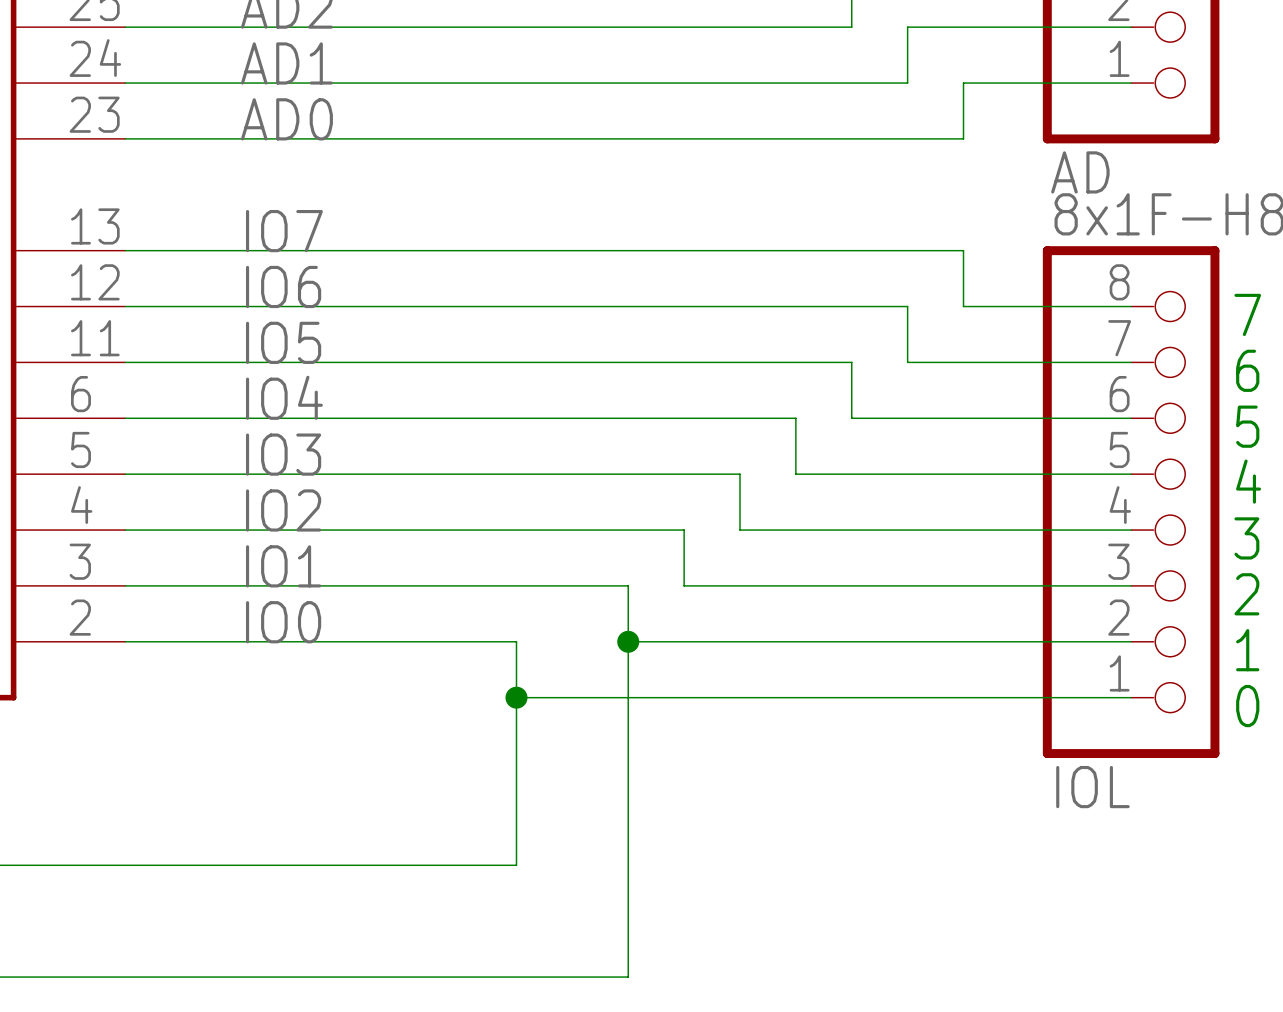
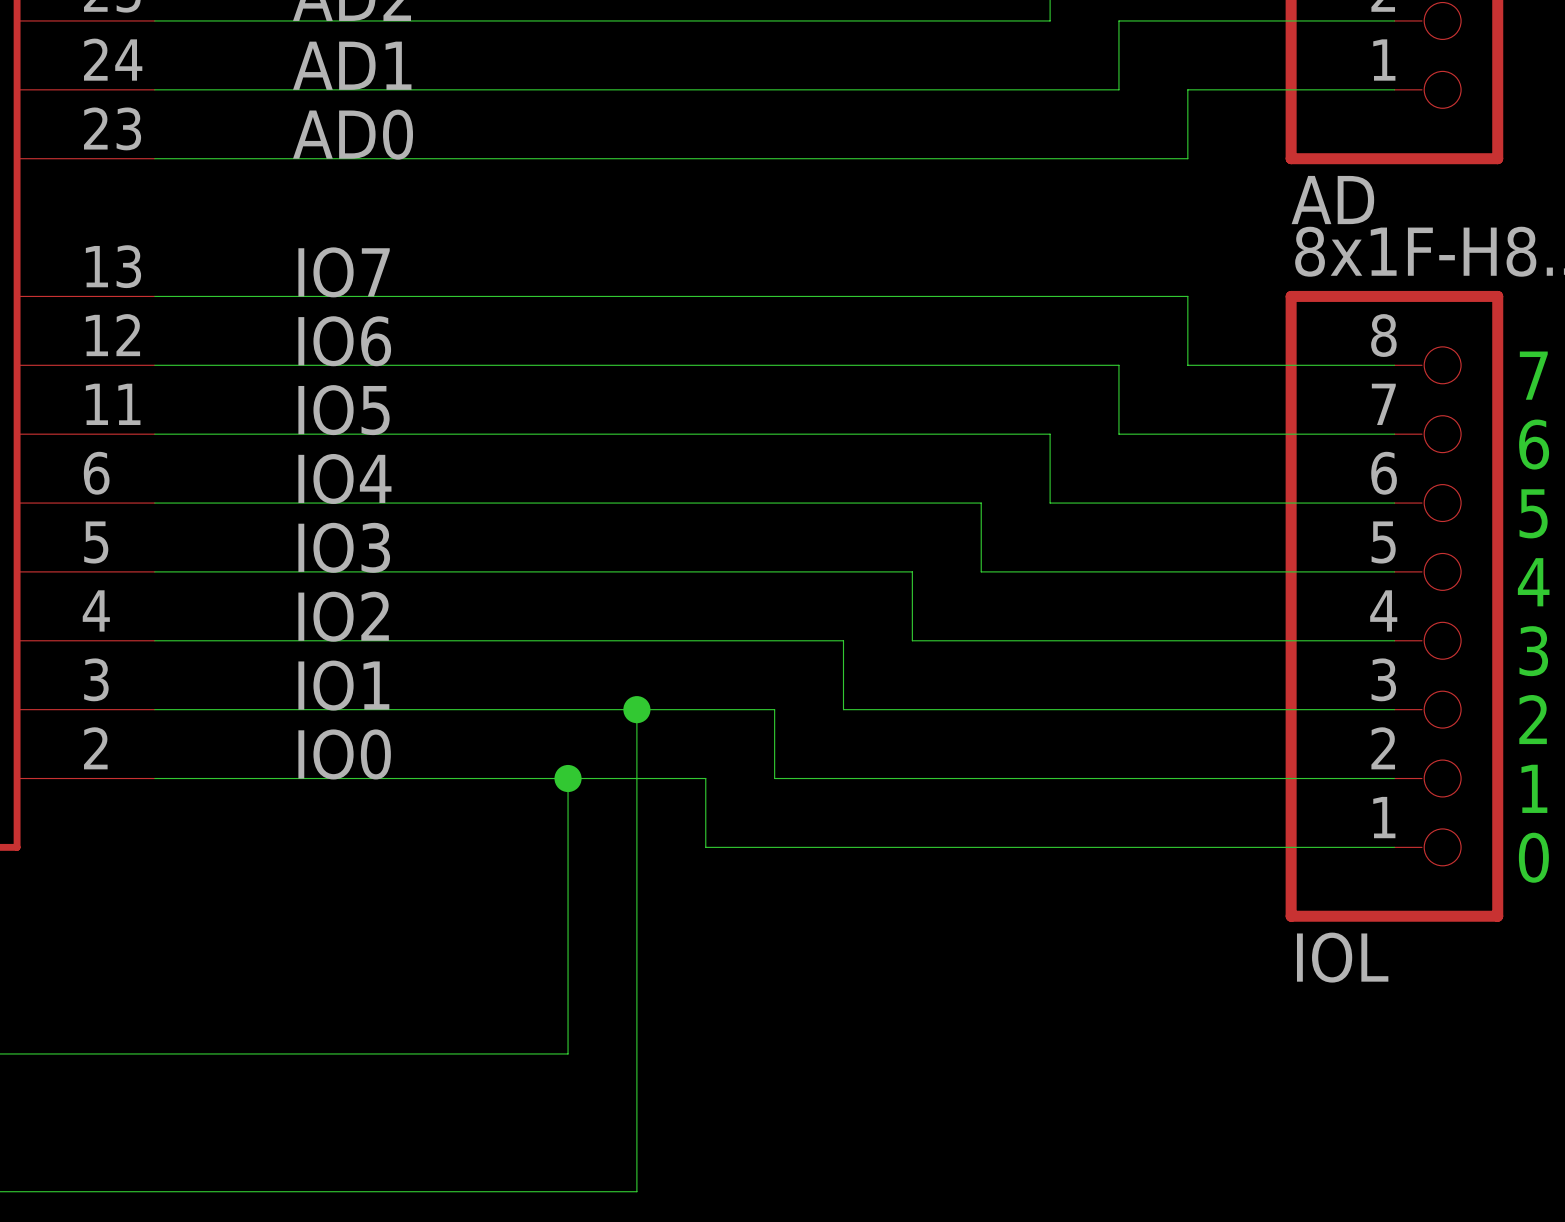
junction: none -> (636, 709)
wire: none -> (568, 778) (568, 1053)
junction: none -> (568, 778)
wire: (628, 641) (628, 977) (516, 977) -> none
junction: (628, 641) -> none
wire: (516, 697) (572, 697) -> (636, 709) (636, 778) (705, 778) (705, 847)
junction: (516, 697) -> none
wire: (460, 865) (516, 865) -> (636, 1191) (636, 1053)

